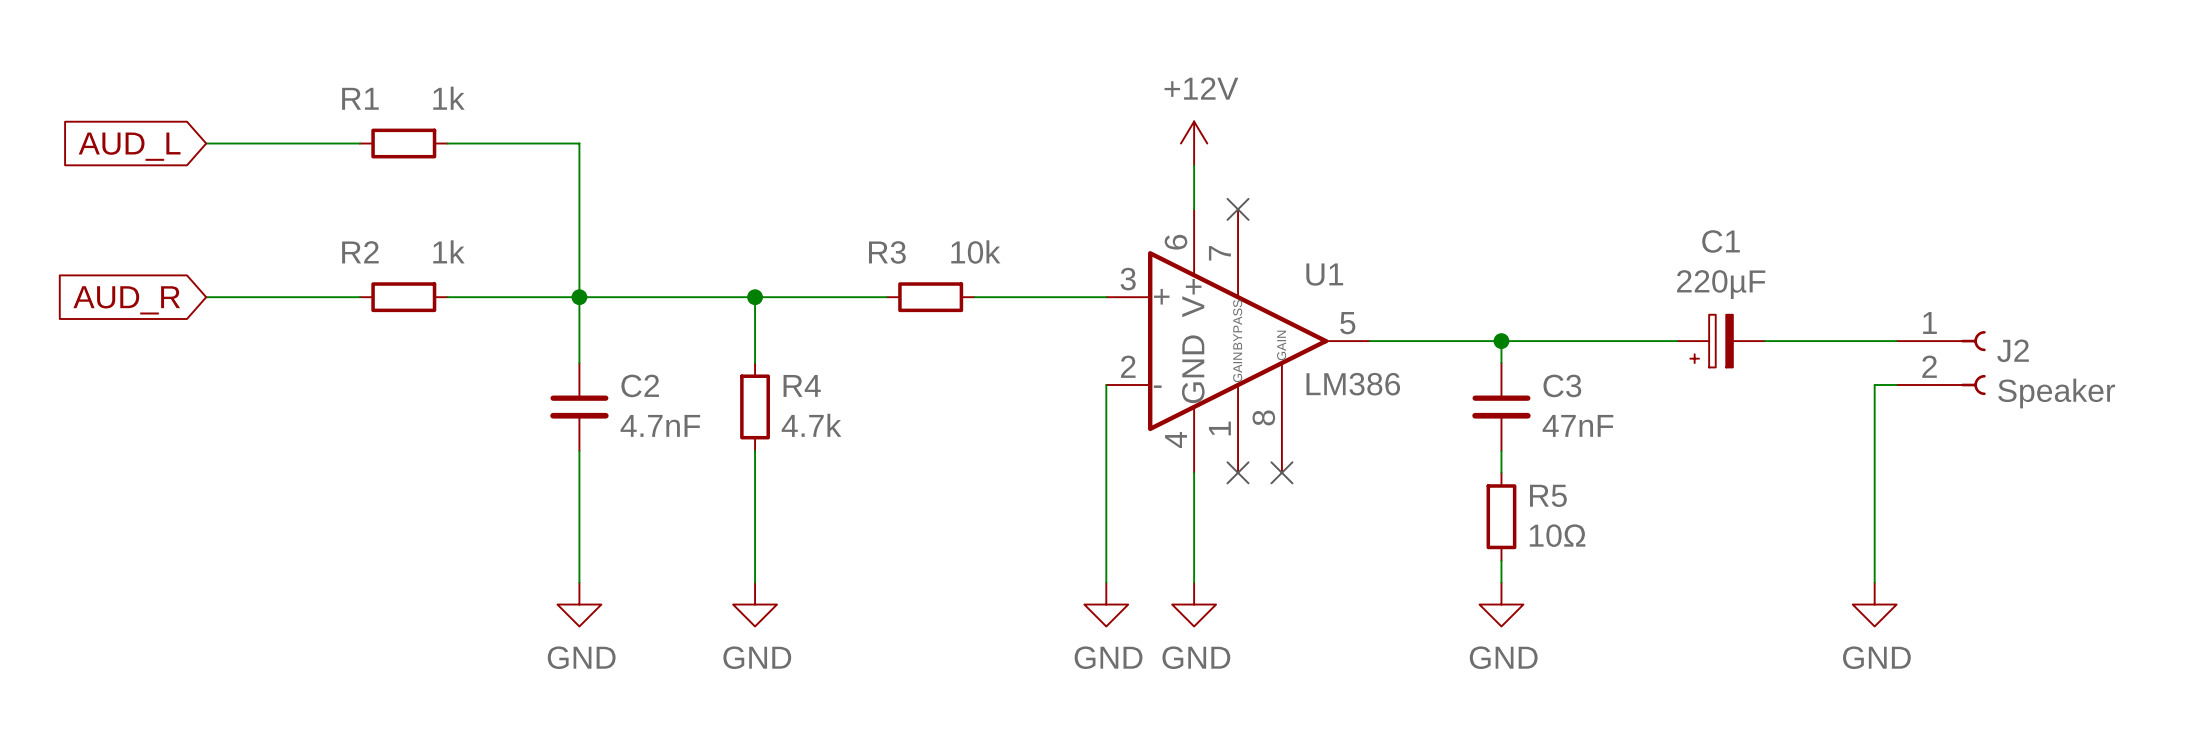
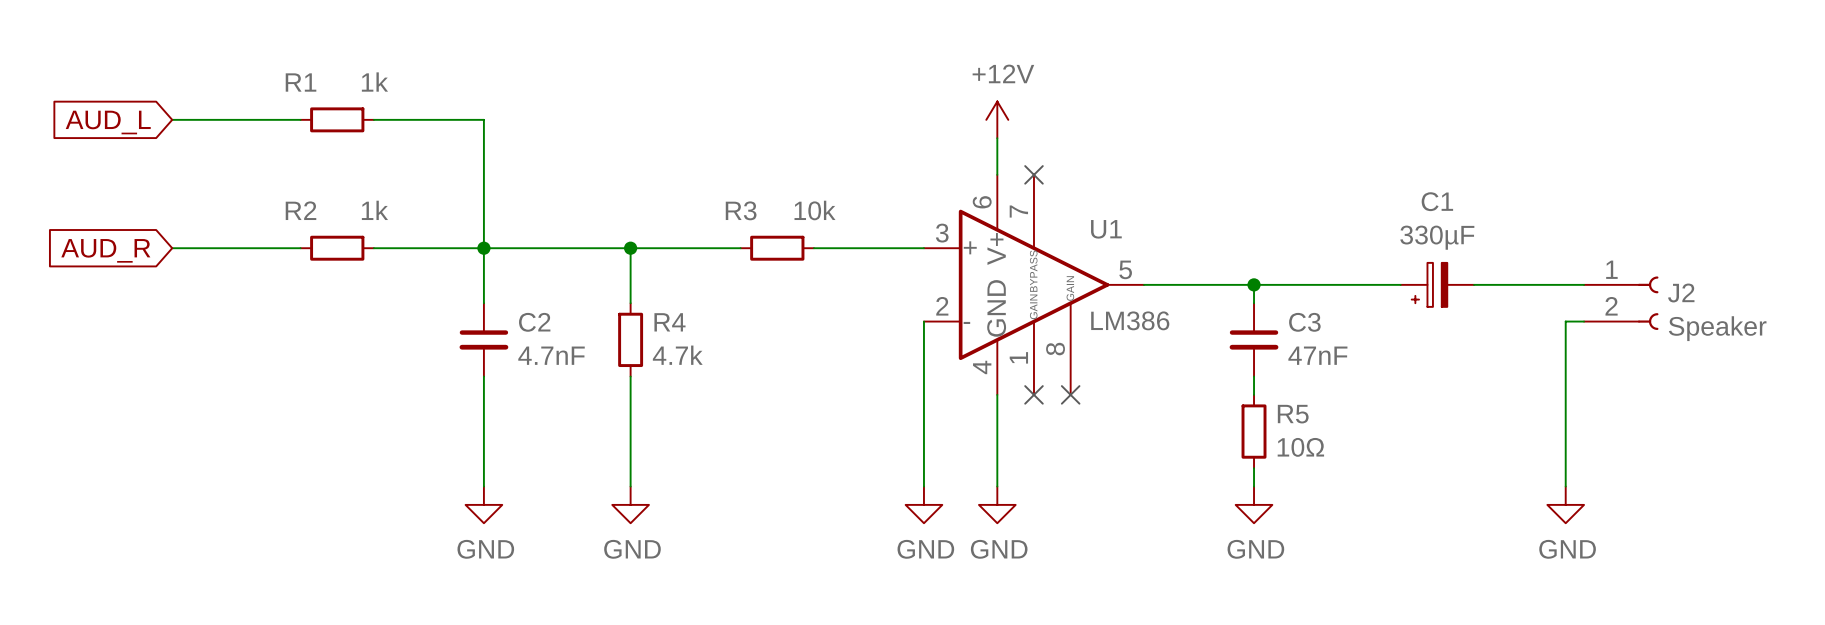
C1 value: 220µF (1721, 284) -> 330µF (1437, 237)

